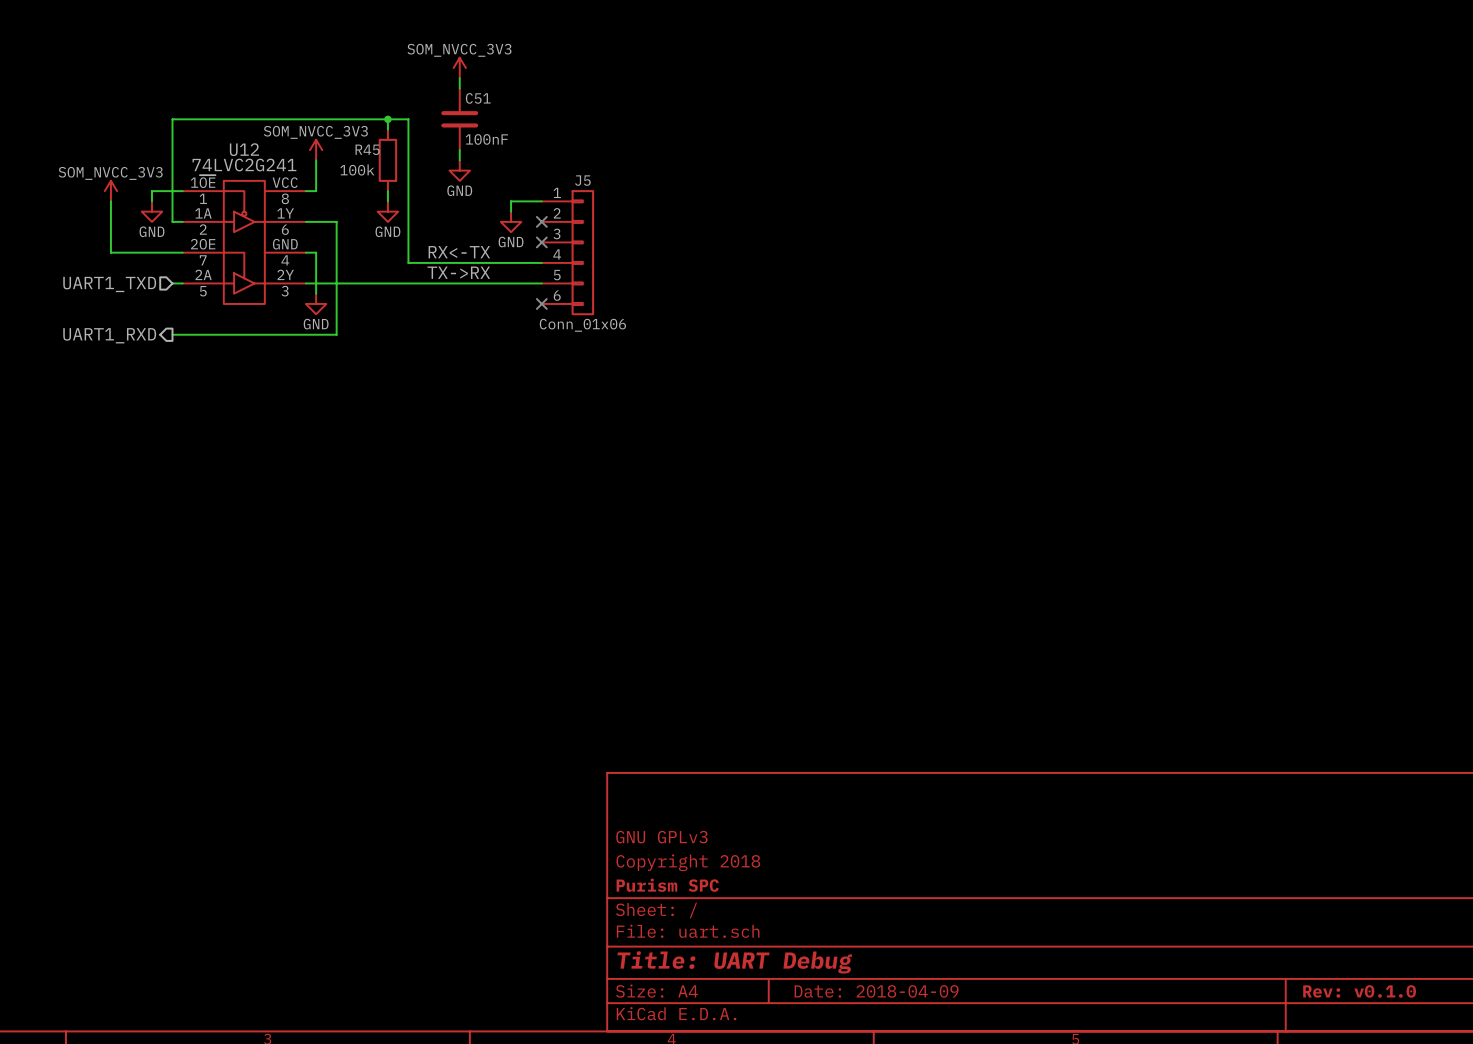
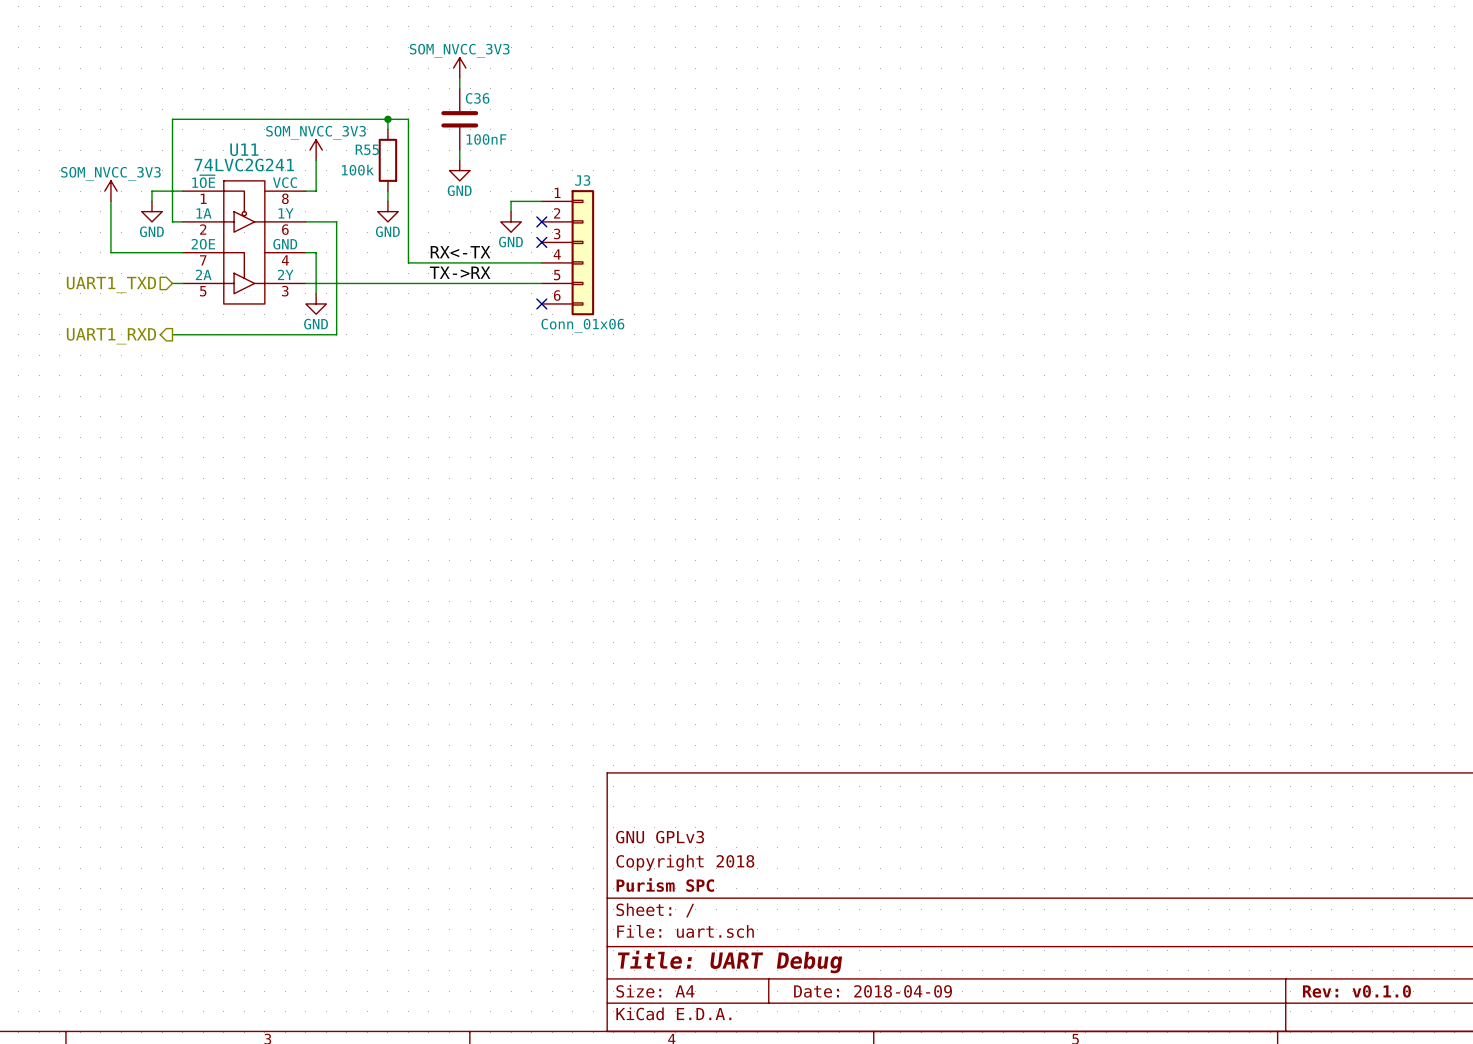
C51 name: C51 (478, 98) -> C36 (477, 98)
U12 name: U12 (244, 149) -> U11 (244, 149)
R45 name: R45 (367, 149) -> R55 (367, 149)
J5 name: J5 (582, 180) -> J3 (582, 180)

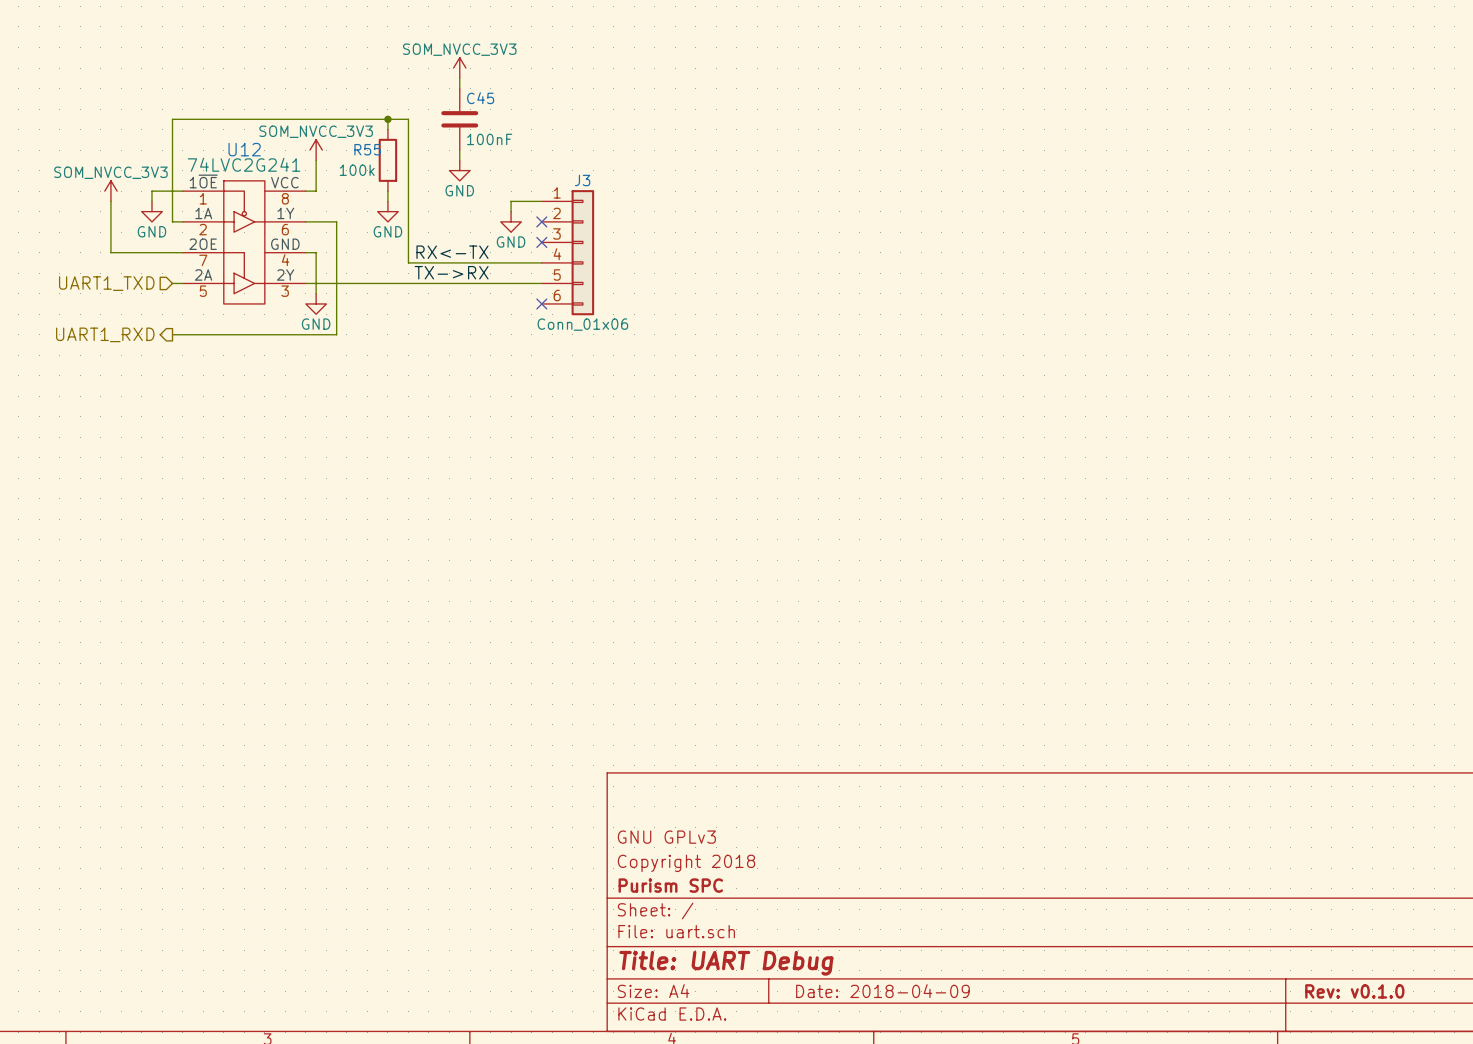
C36 name: C36 (477, 98) -> C45 (480, 98)
U11 name: U11 (244, 149) -> U12 (244, 149)

